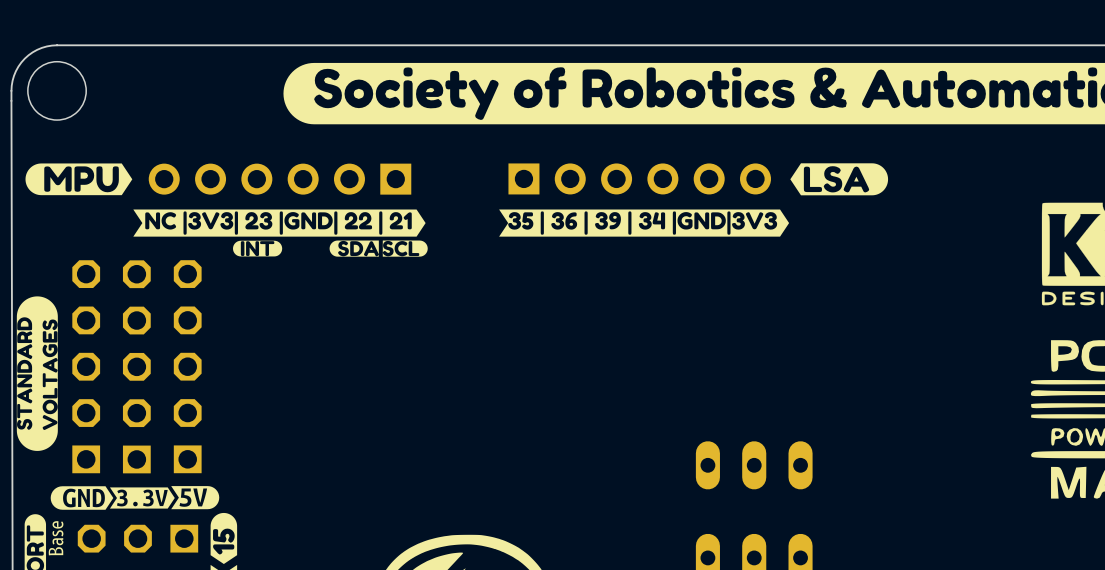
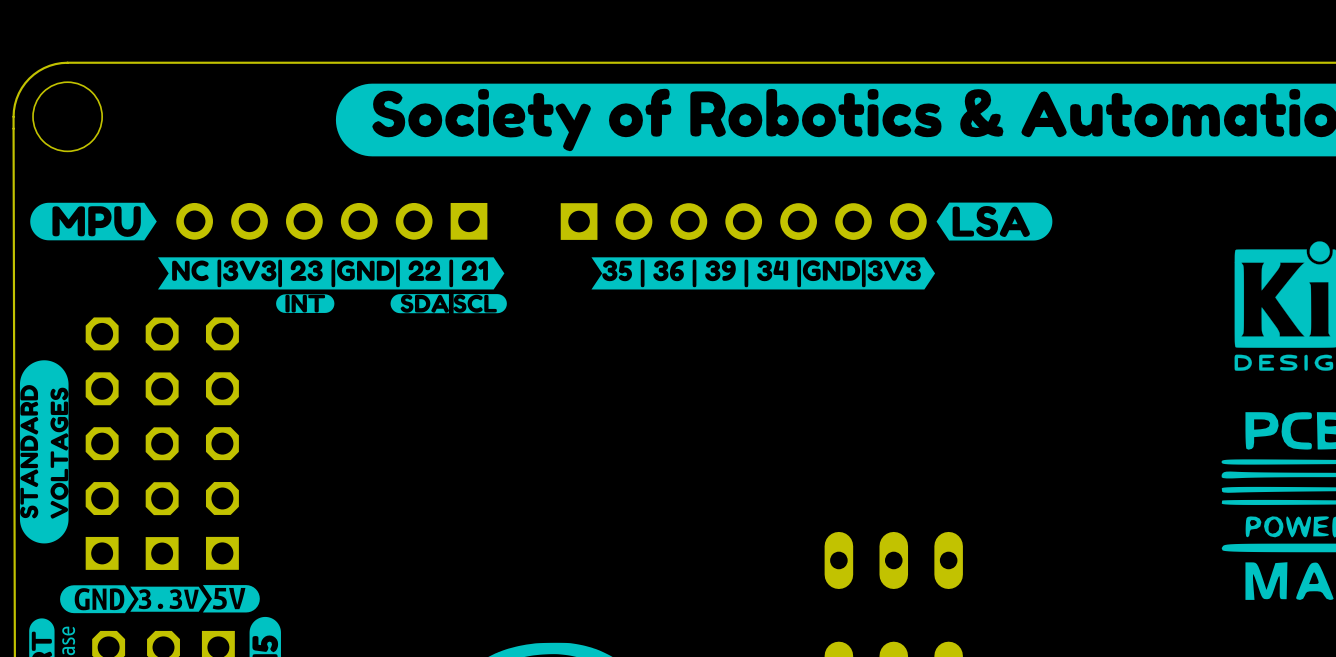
part footprint: [508, 163, 772, 195] -> [560, 203, 927, 240]

